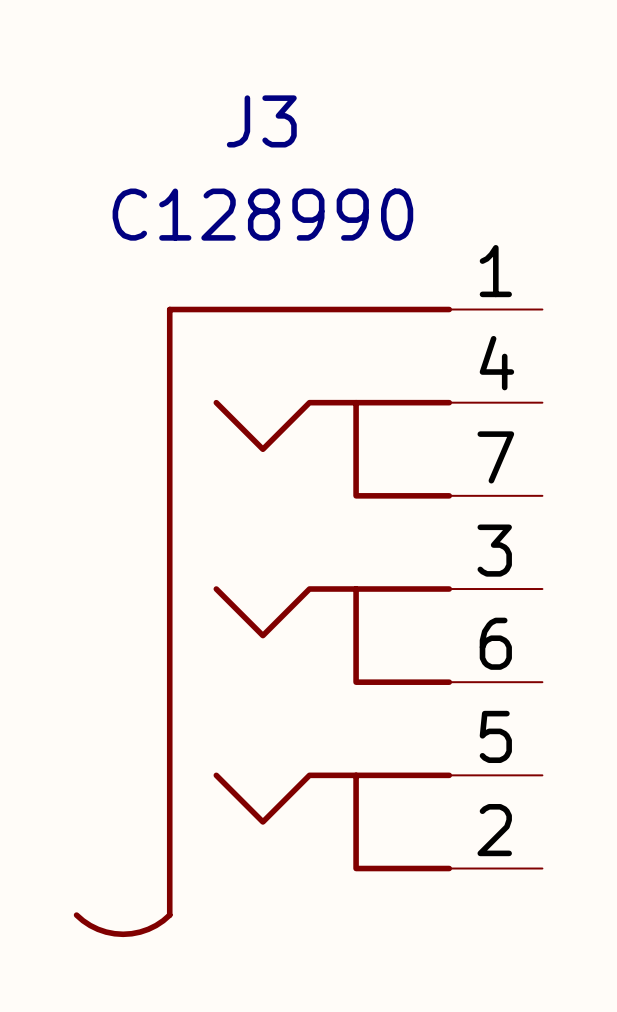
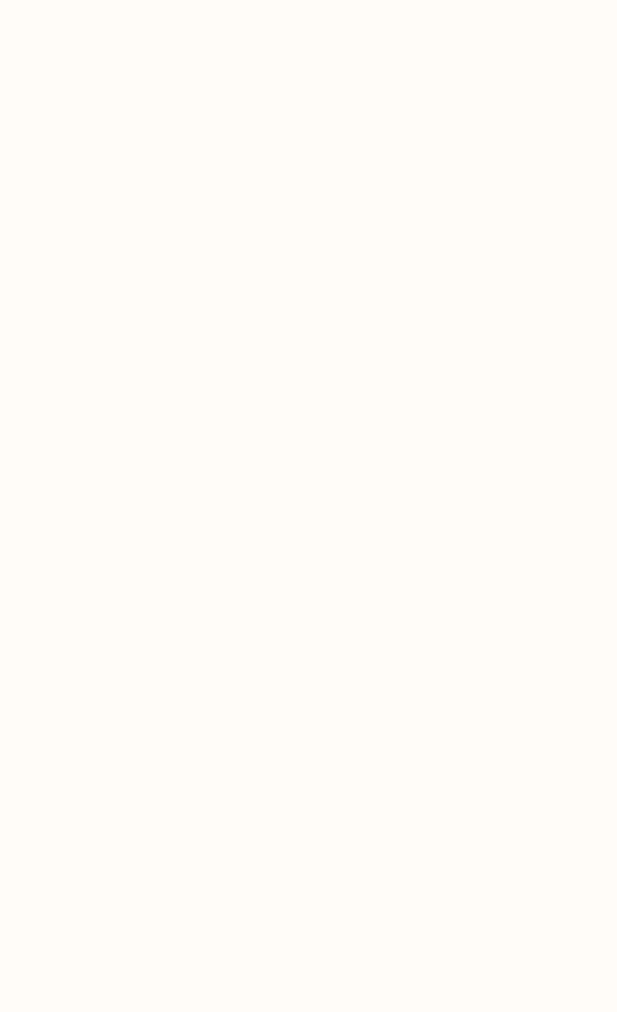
J3: C128990 (308, 621) -> none

